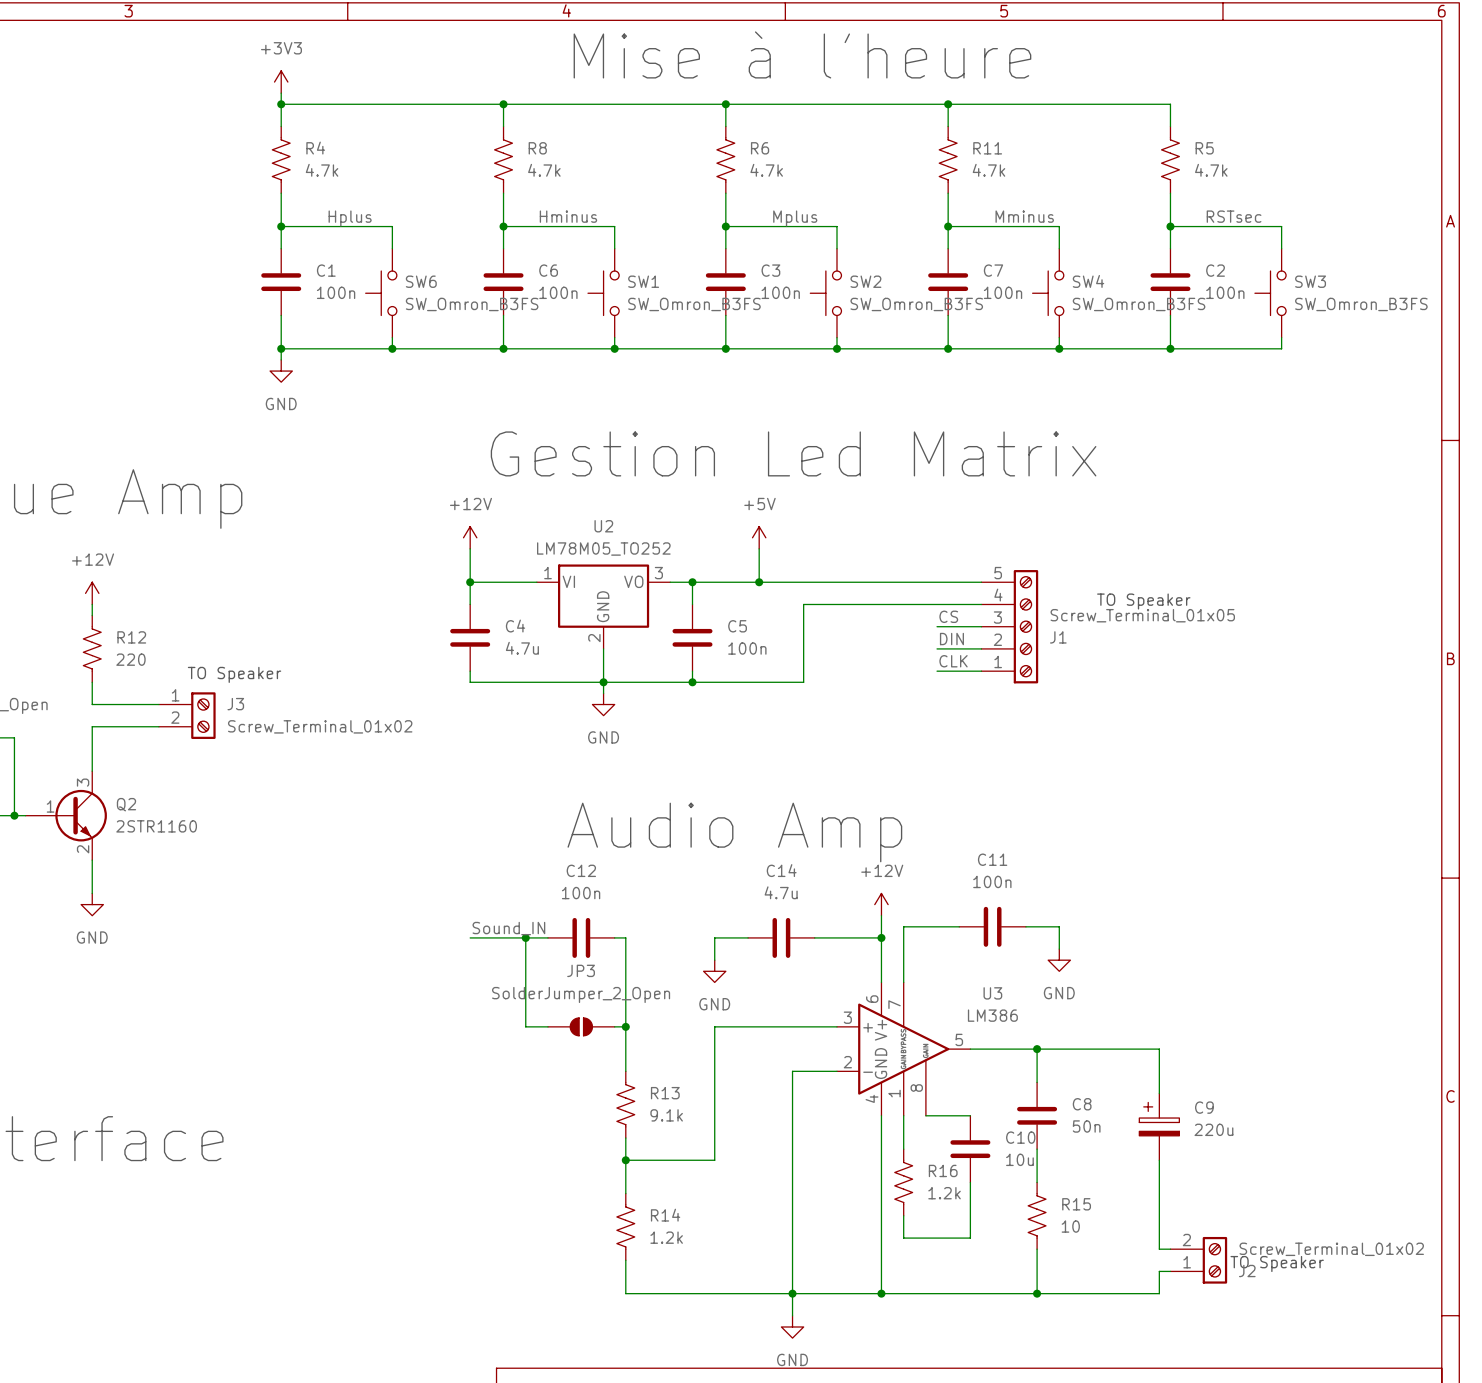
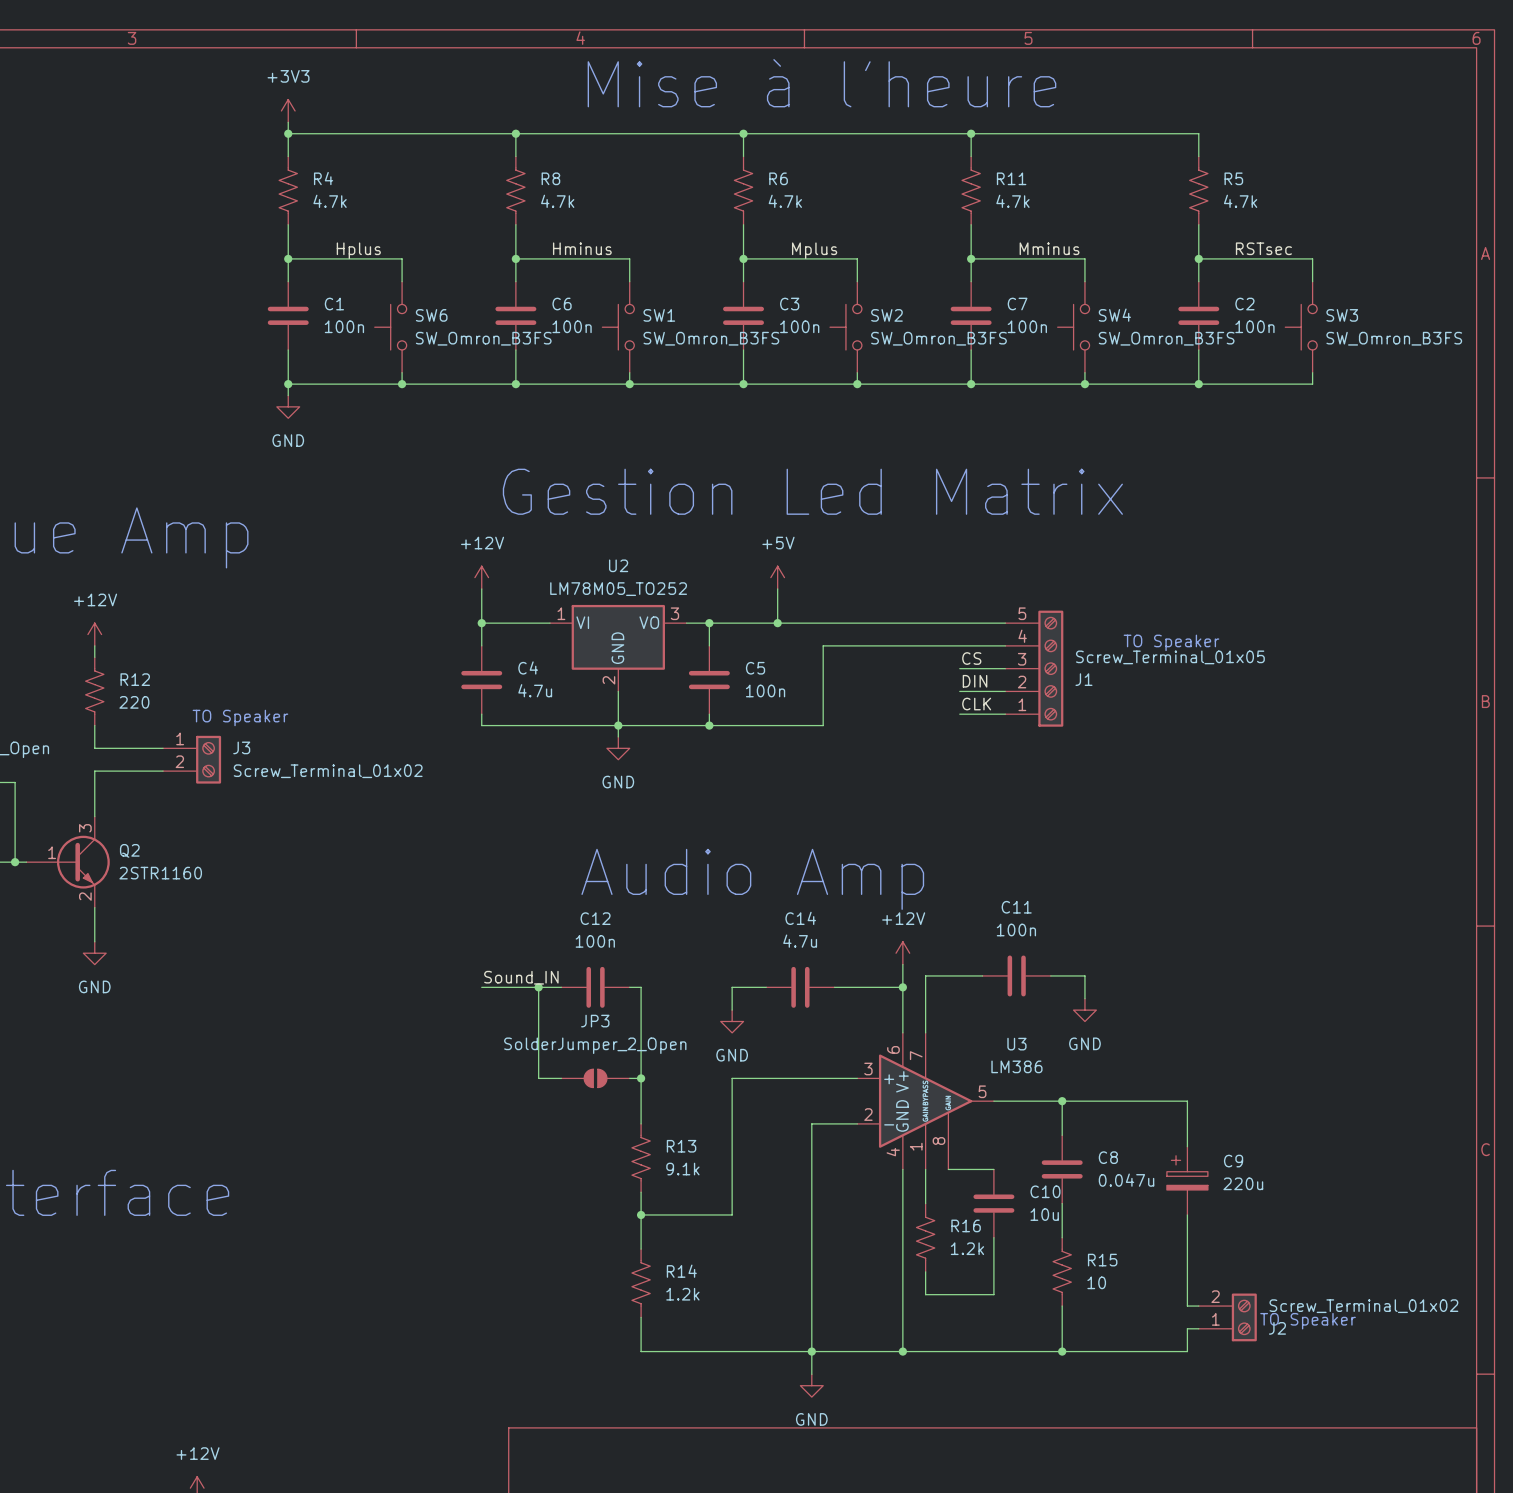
C8 value: 50n (1086, 1126) -> 0.047u (1126, 1180)

